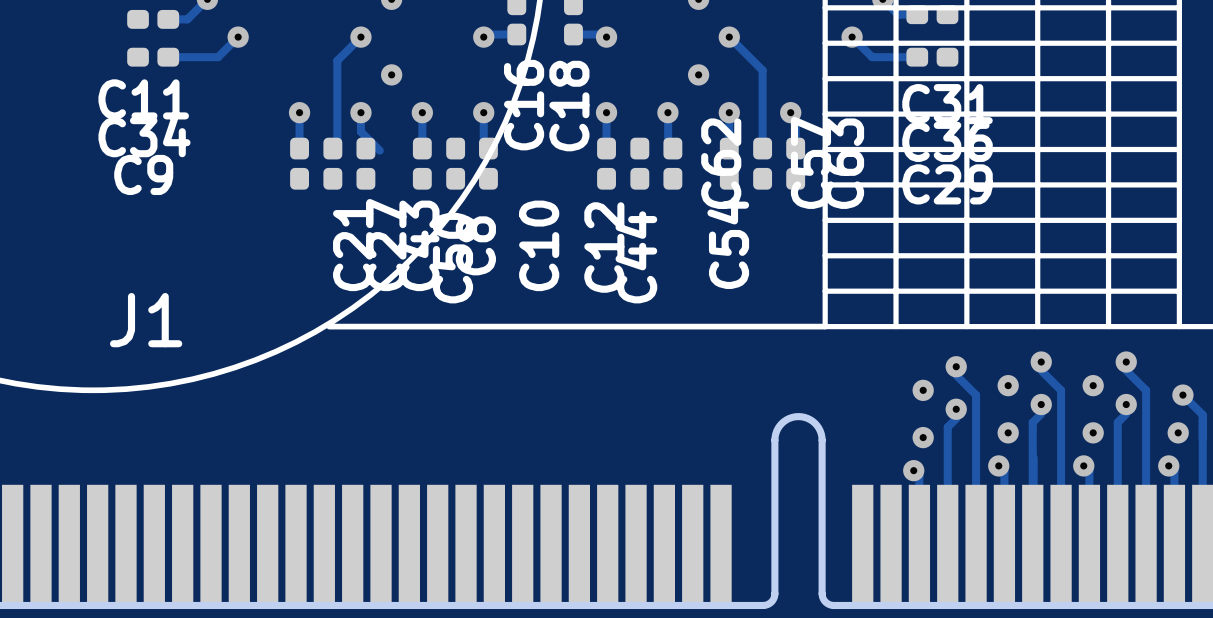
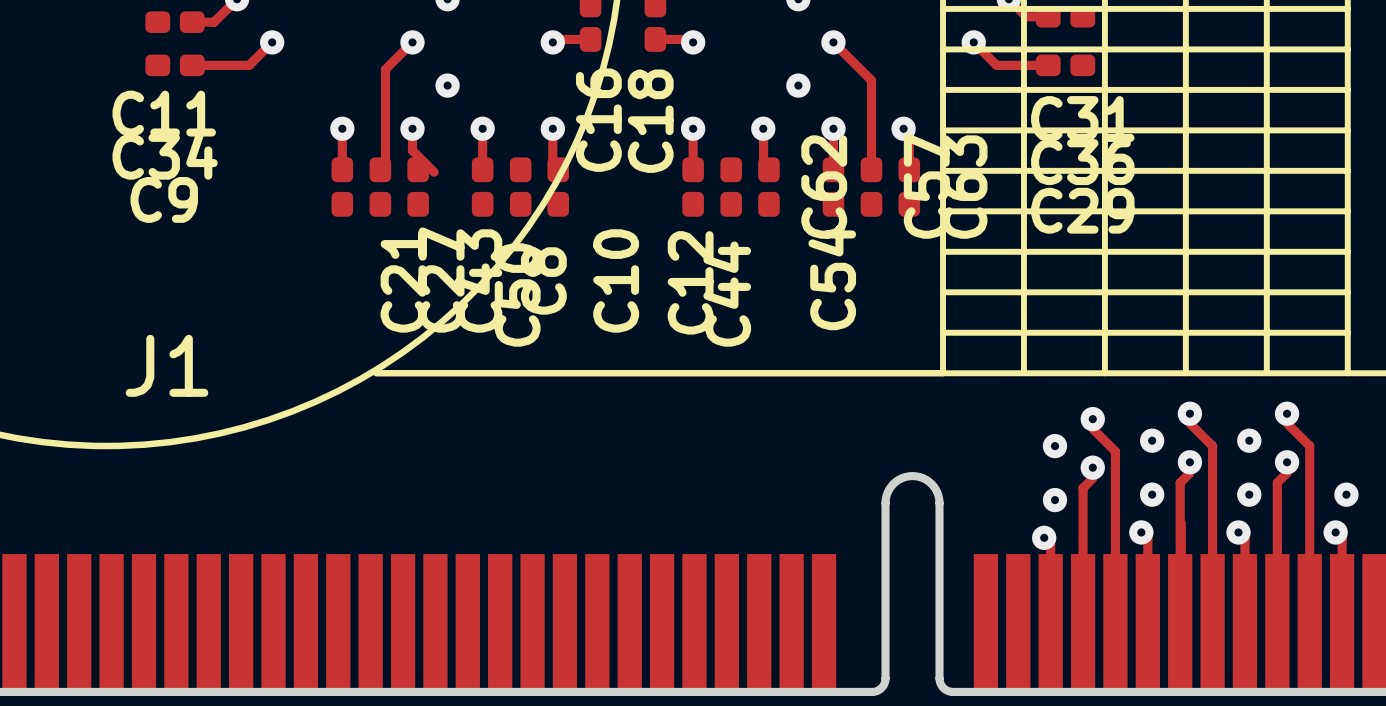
track: (1182, 395) (1202, 414) (1202, 543) -> none
via: (1182, 395) -> none

